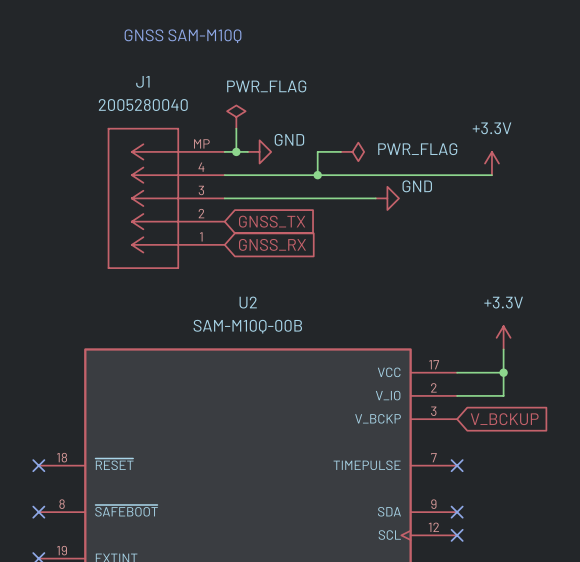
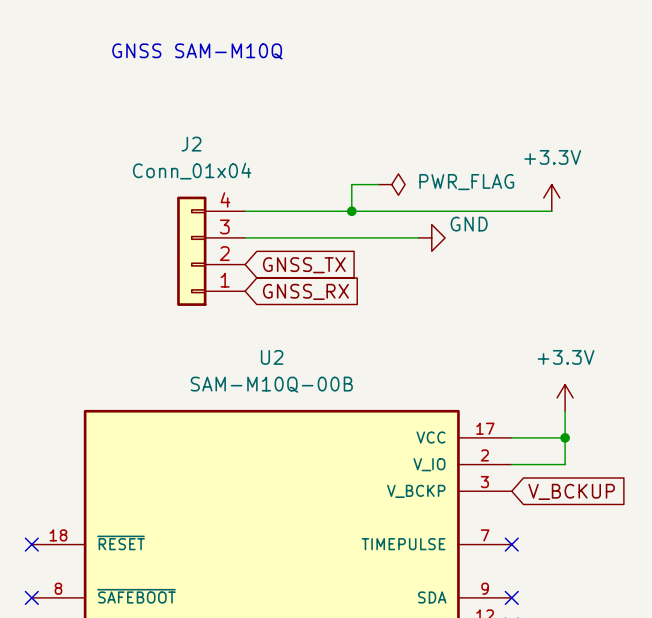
power symbol: PWR_FLAG (236, 117) -> none
wire: (236, 128) (236, 151) -> none
wire: (224, 151) (247, 151) -> none
junction: (236, 151) -> none
power symbol: GND (259, 151) -> none
J1: 2005280040 (166, 198) -> none
J2: none -> Conn_01x04 (211, 251)

